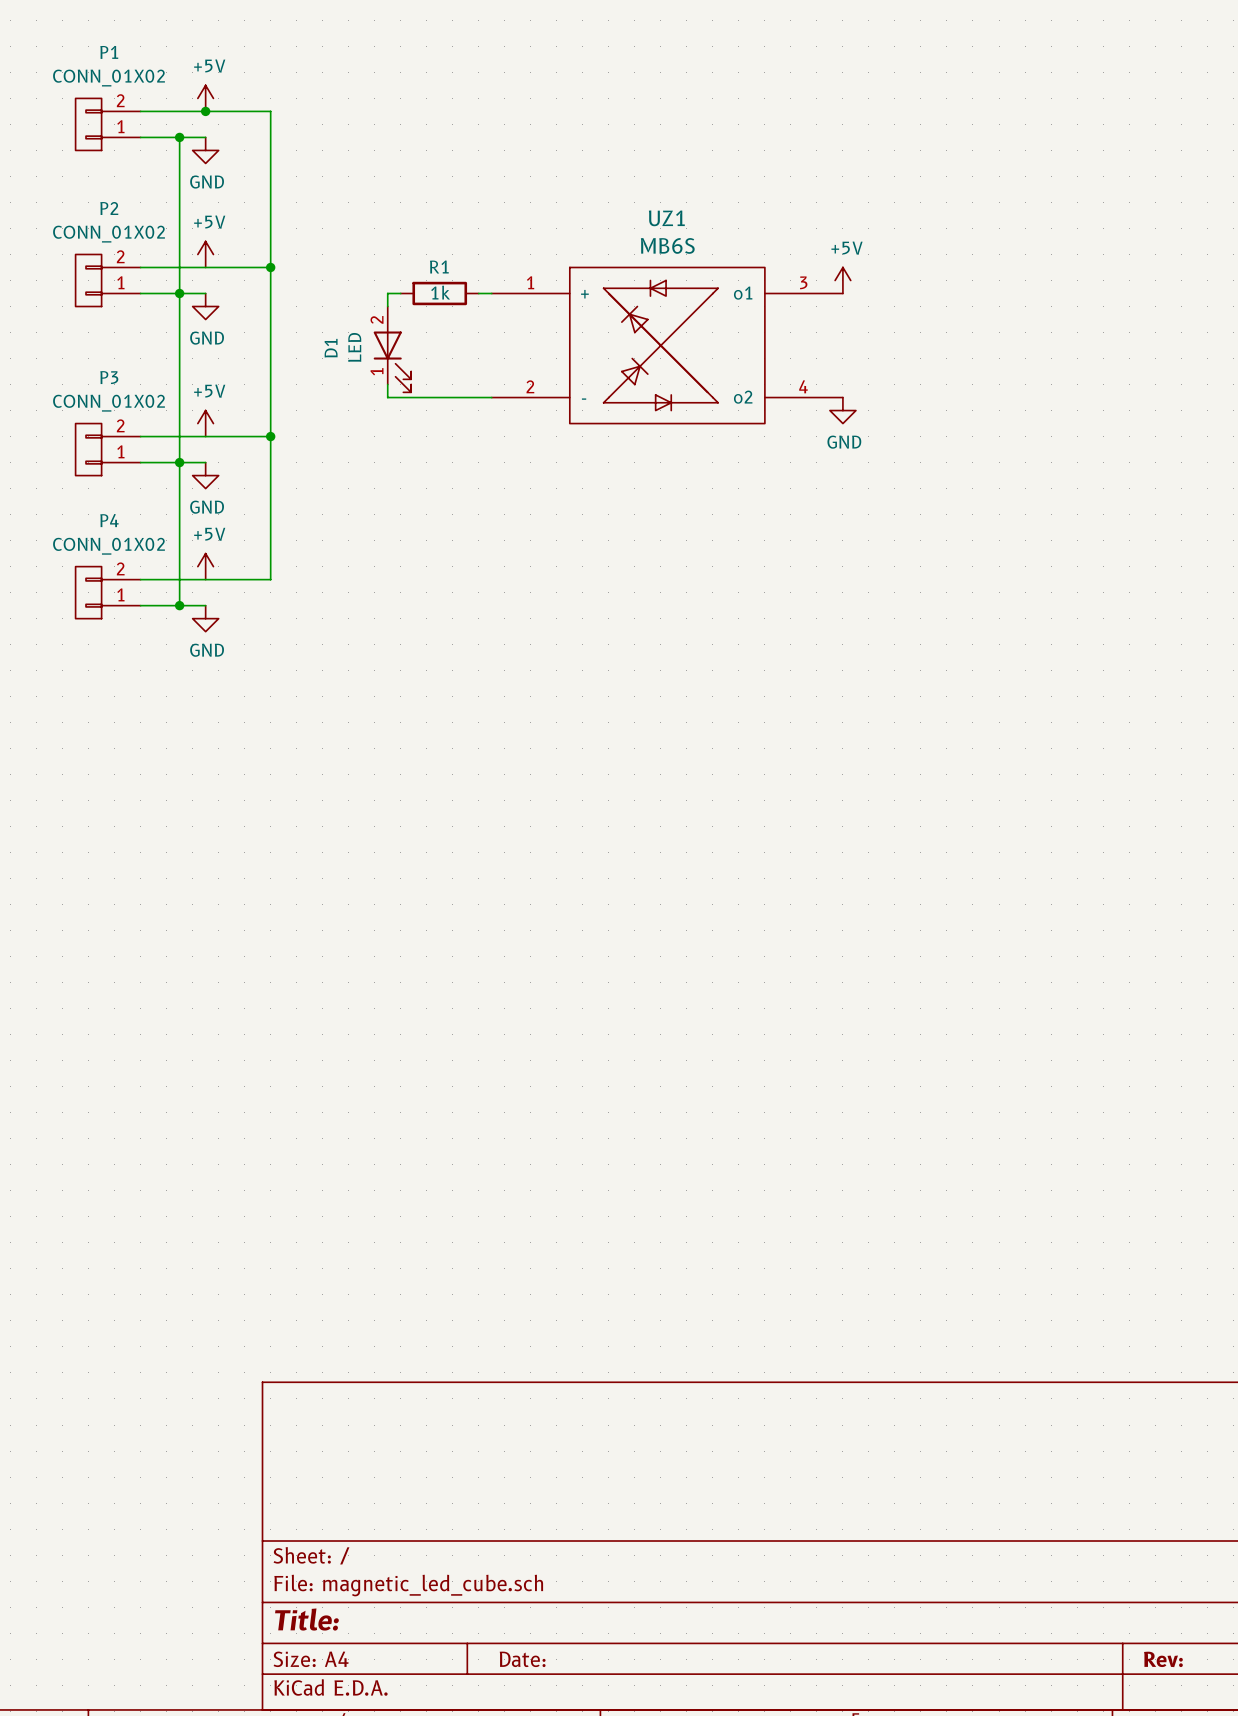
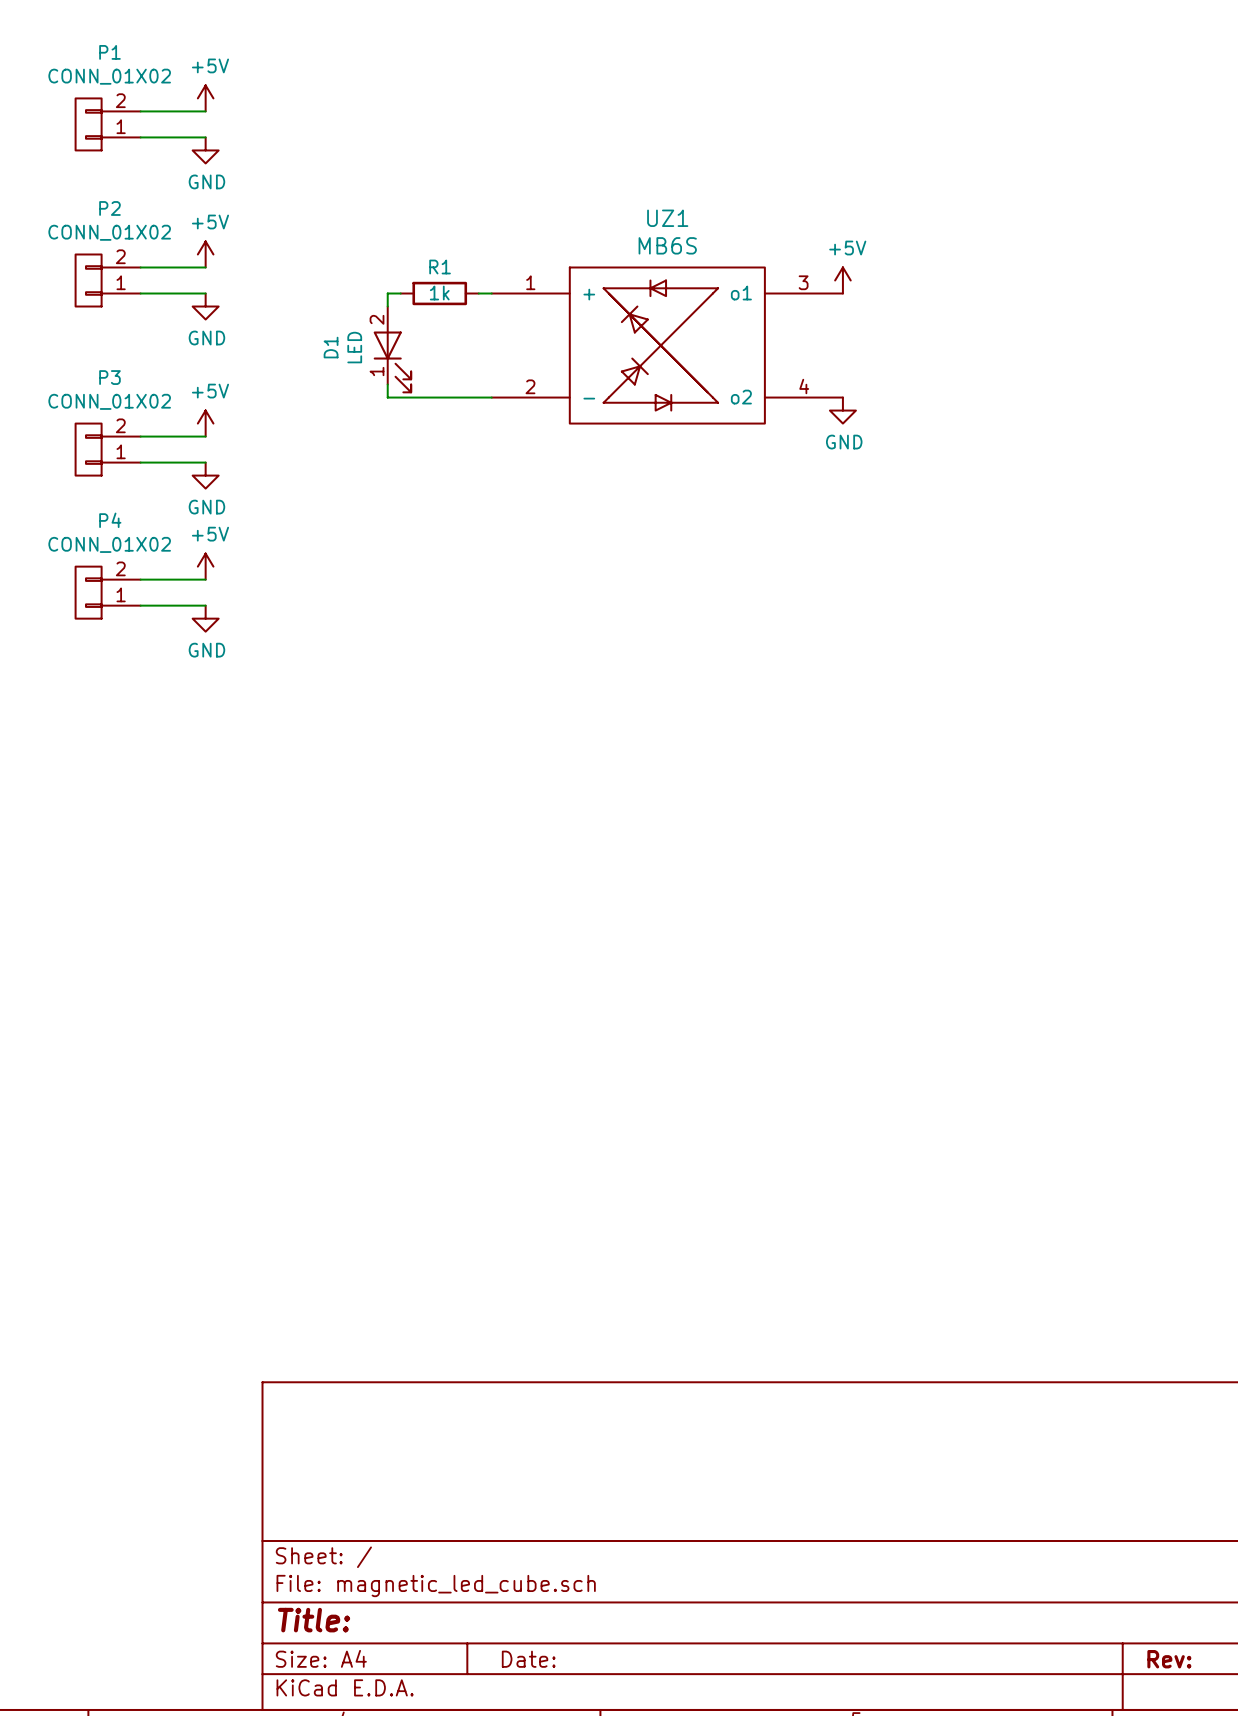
wire: (205, 111) (270, 111) (270, 579) (205, 579) -> none
junction: (205, 111) -> none
wire: (179, 137) (179, 605) -> none
junction: (179, 137) -> none
wire: (205, 267) (270, 267) -> none
junction: (270, 267) -> none
junction: (179, 293) -> none
wire: (205, 436) (270, 436) -> none
junction: (270, 436) -> none
junction: (179, 462) -> none
junction: (179, 605) -> none

